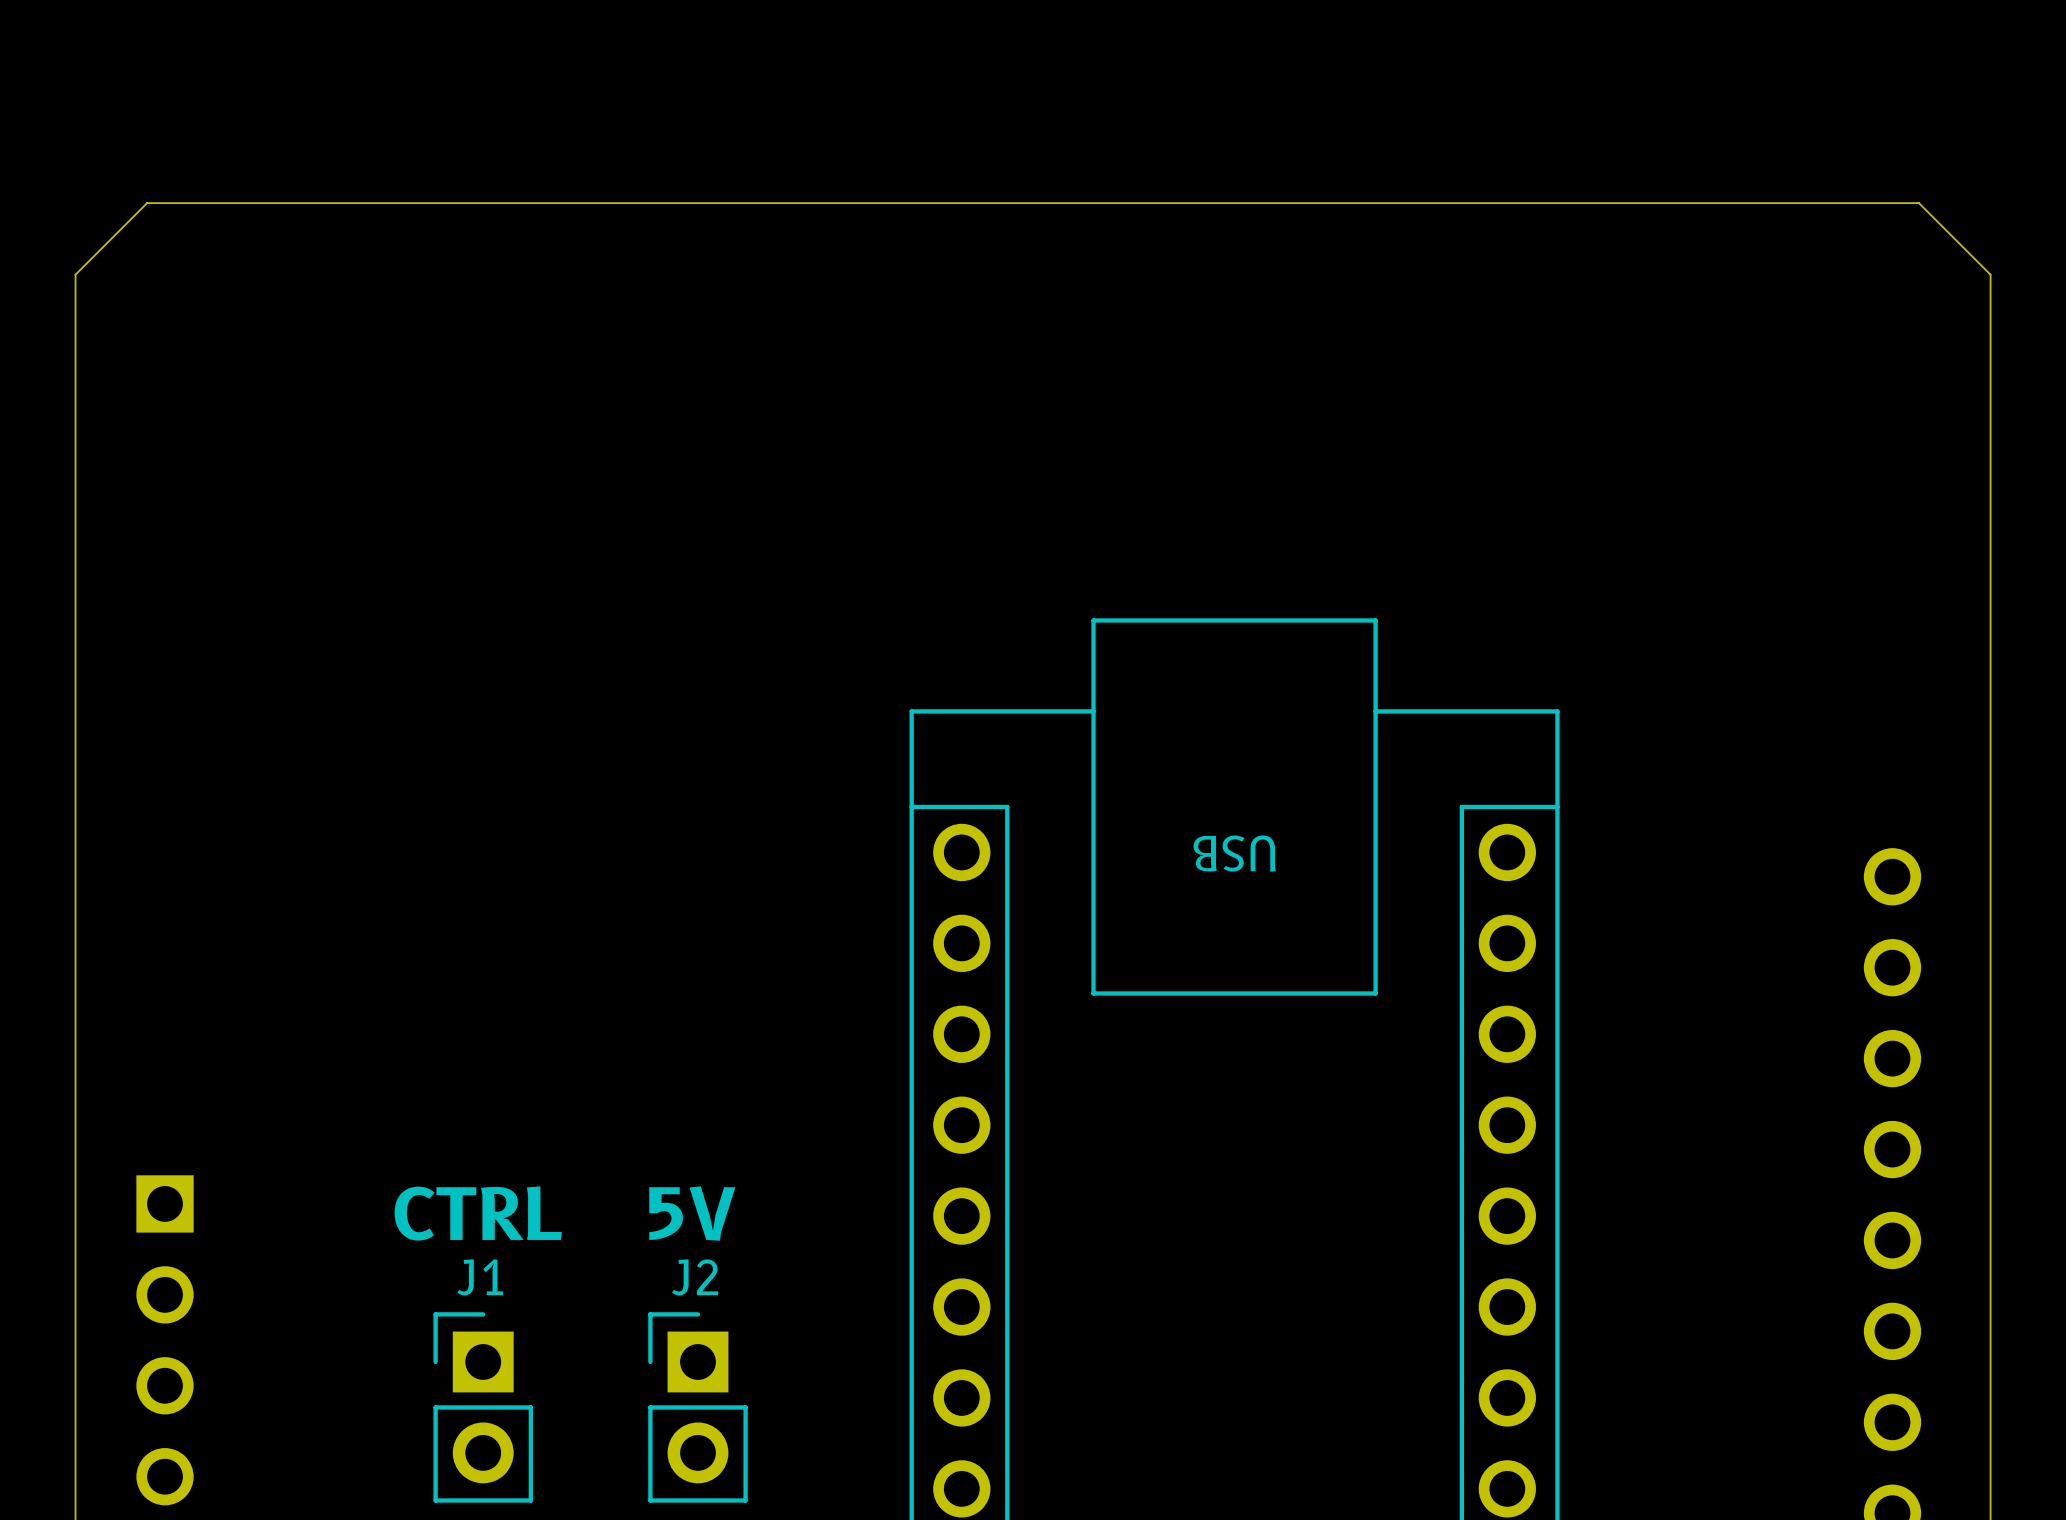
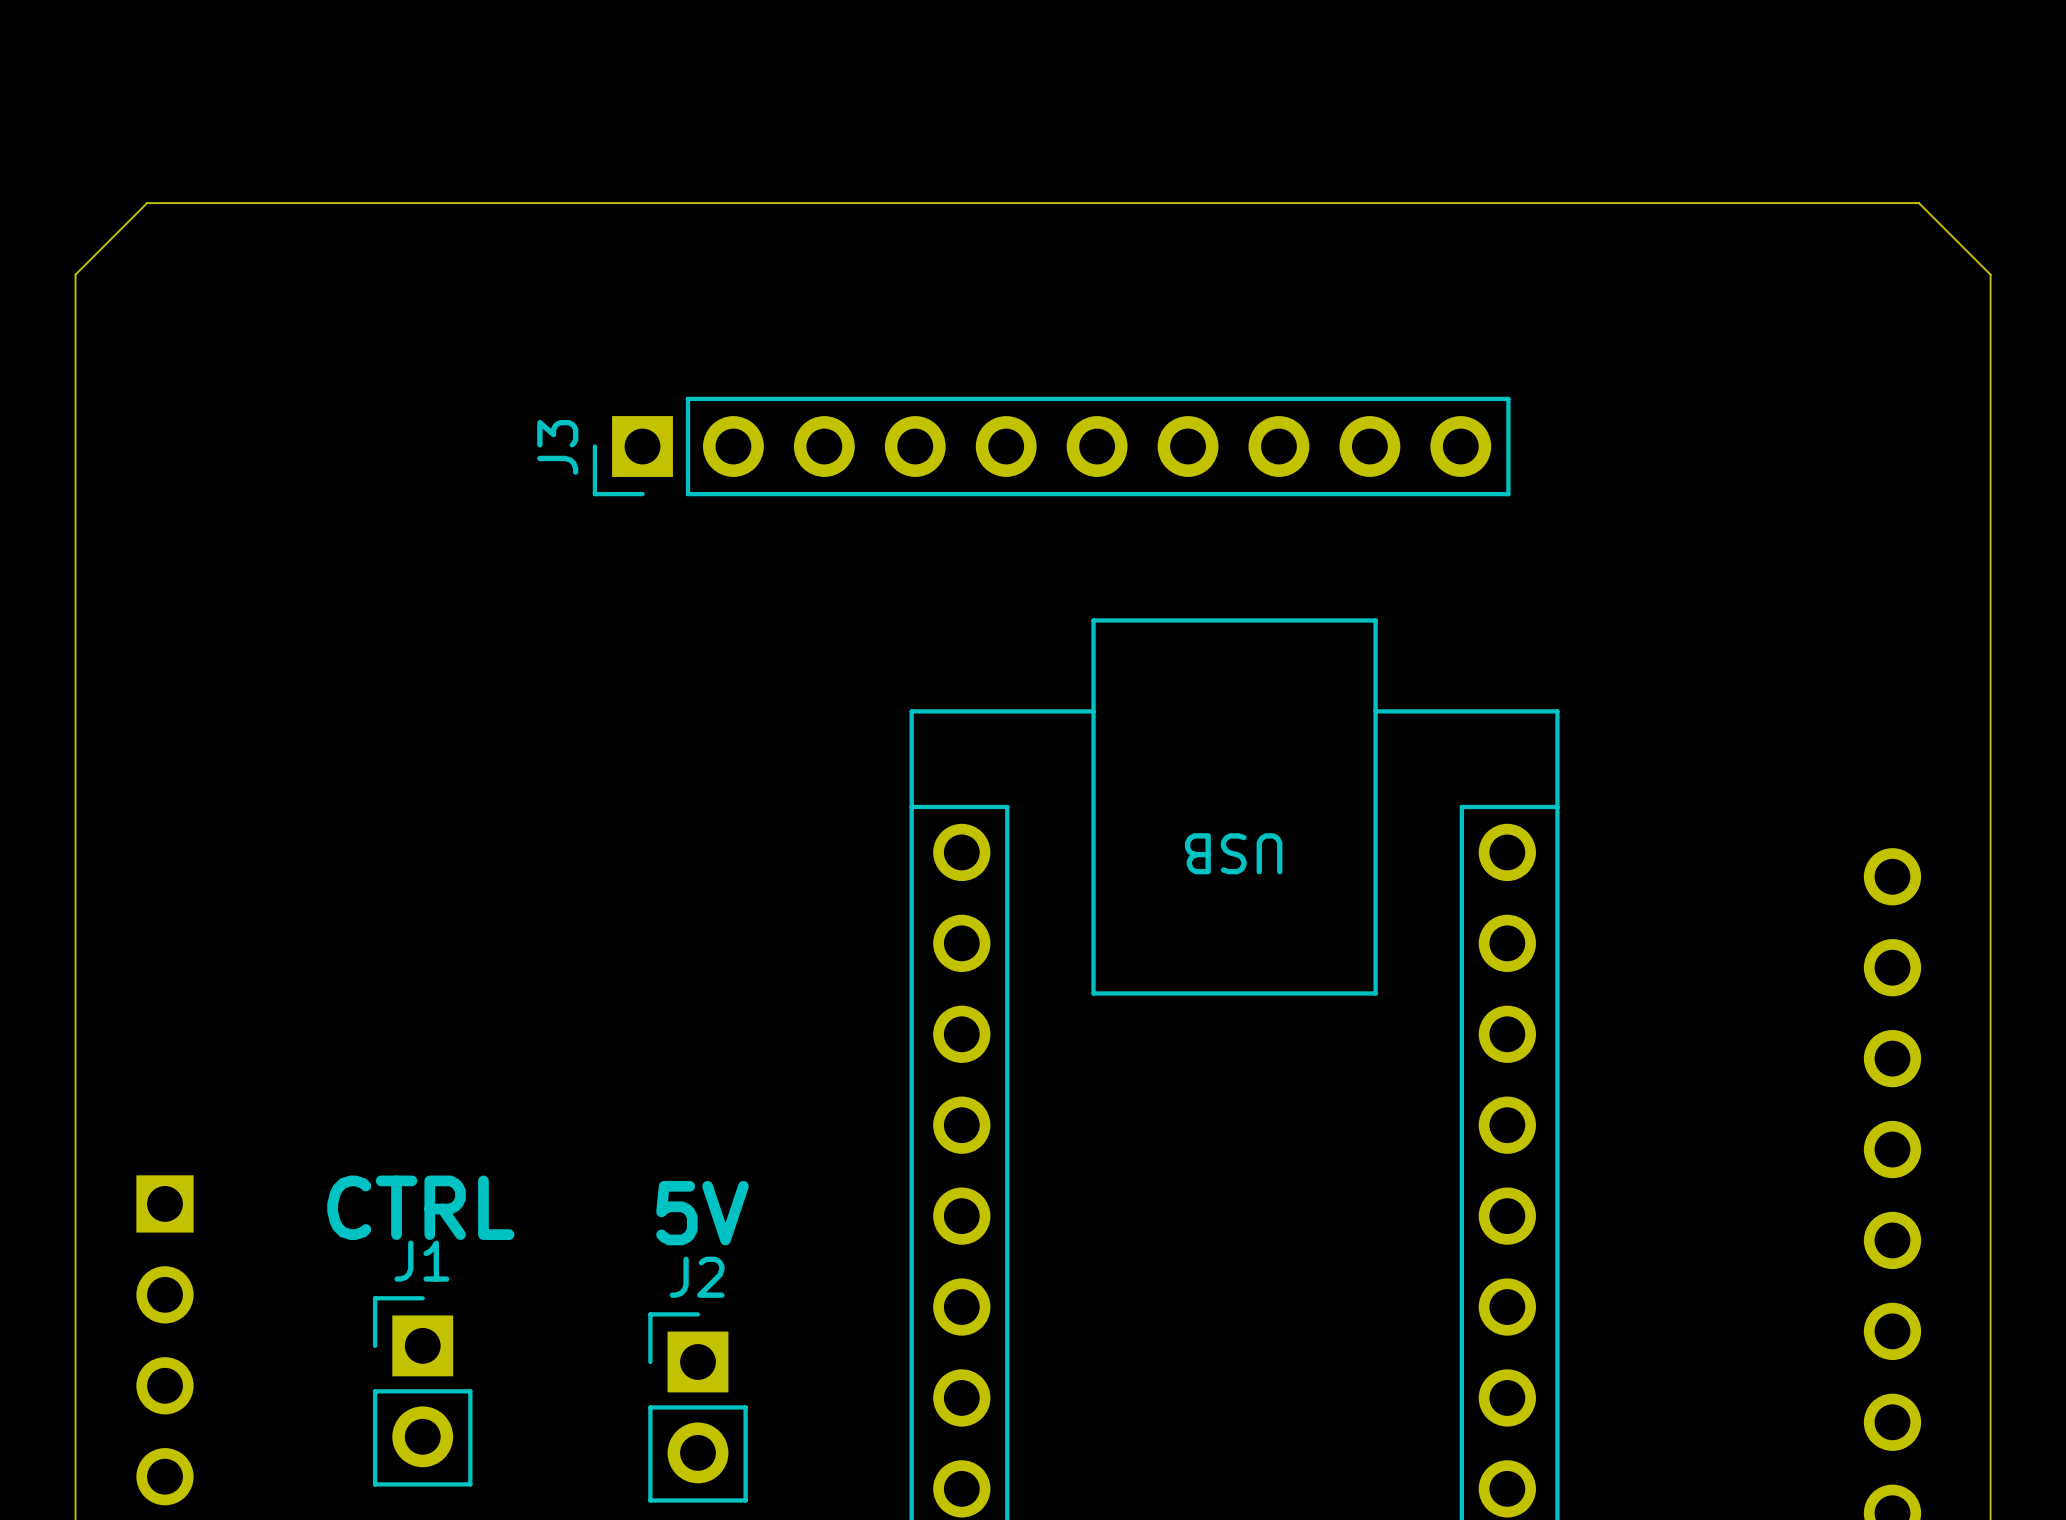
J3: none -> (1051, 446)
text position: CTRL (478, 1213) -> CTRL (420, 1207)
J1 position: (483, 1407) -> (422, 1391)

